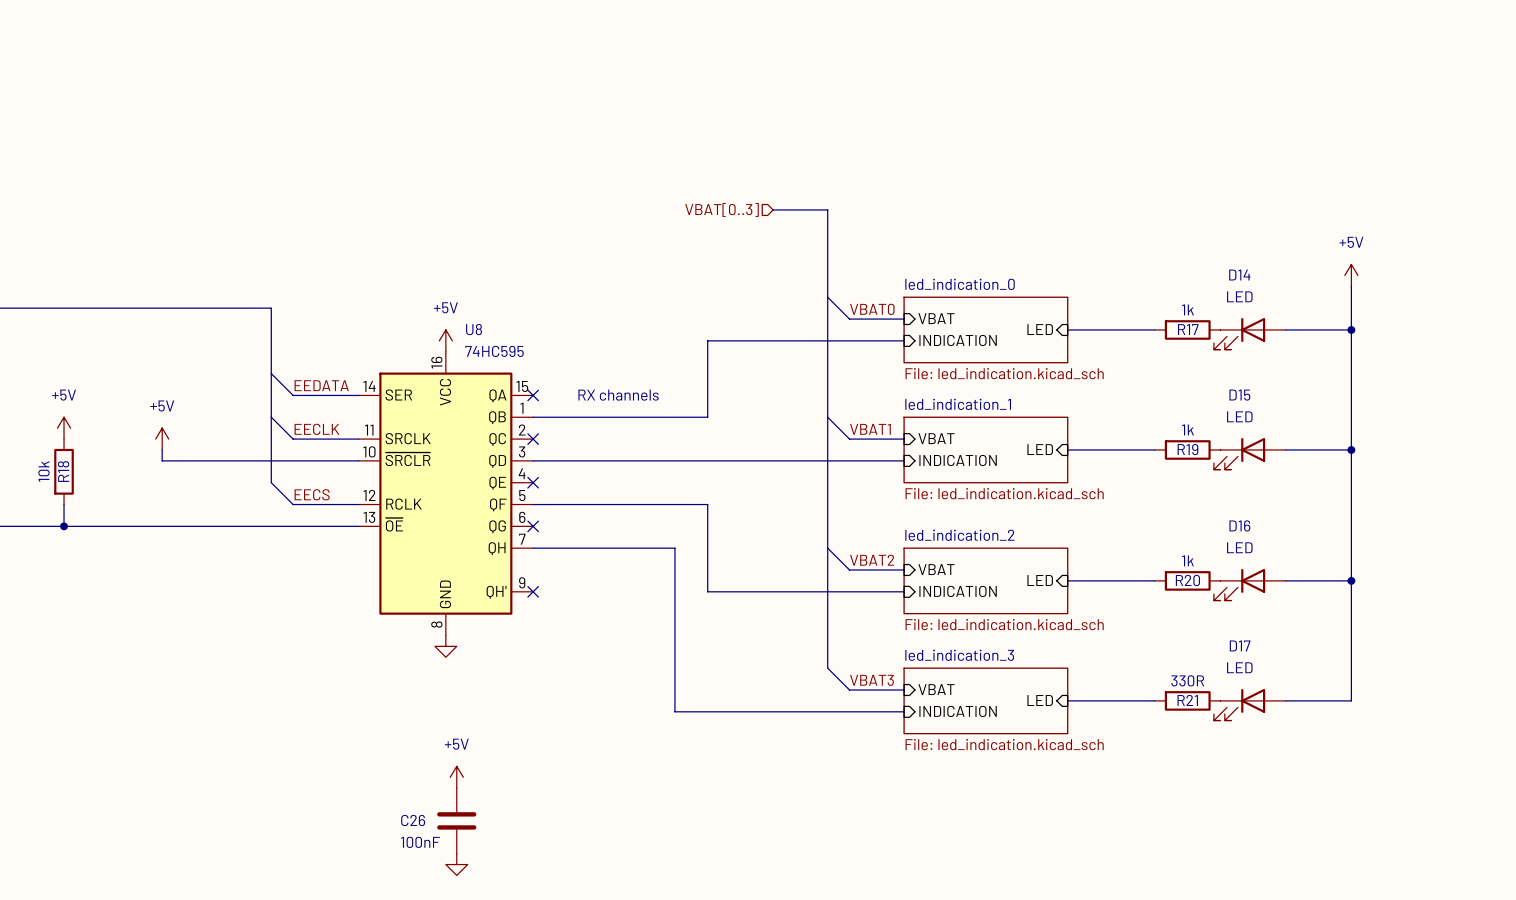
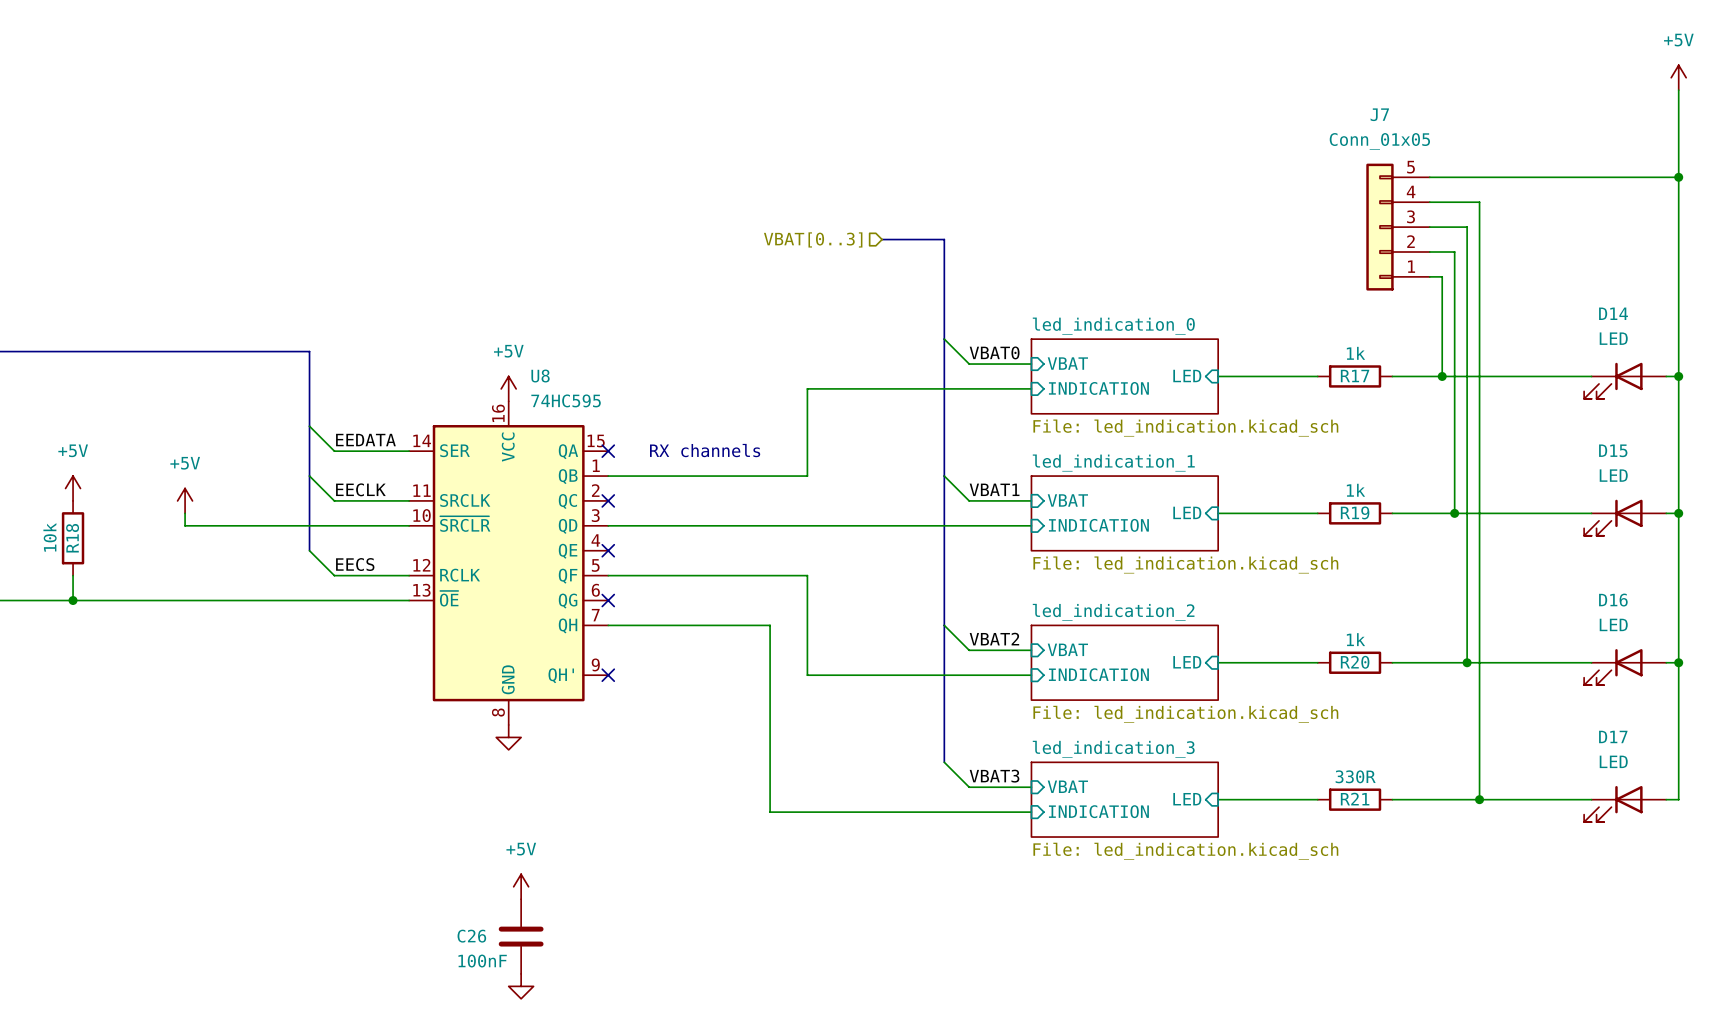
power symbol: none -> +5V (1678, 77)
wire: none -> (1678, 90) (1678, 799) (1666, 799)
wire: none -> (1429, 177) (1678, 177)
junction: none -> (1678, 177)
wire: none -> (1429, 202) (1479, 202) (1479, 799)
J7: none -> Conn_01x05 (1398, 227)
wire: none -> (1429, 227) (1467, 227) (1467, 662) (1392, 662)
wire: none -> (1429, 252) (1454, 252) (1454, 513)
wire: none -> (1429, 276) (1442, 276) (1442, 376)
power symbol: +5V (1351, 275) -> none
wire: (1351, 286) (1351, 700) -> (1591, 799) (1541, 799)
junction: none -> (1442, 376)
wire: none -> (1541, 376) (1591, 376)
junction: (1351, 329) -> none
wire: none -> (1666, 376) (1678, 376)
junction: none -> (1678, 376)
D14 position: (1249, 333) -> (1625, 380)
junction: none -> (1454, 513)
wire: none -> (1541, 513) (1591, 513)
junction: (1351, 449) -> none
wire: none -> (1666, 513) (1678, 513)
junction: none -> (1678, 513)
D15 position: (1249, 453) -> (1625, 517)
junction: none -> (1467, 662)
wire: none -> (1541, 662) (1591, 662)
junction: (1351, 580) -> none
wire: none -> (1666, 662) (1678, 662)
junction: none -> (1678, 662)
D16 position: (1249, 584) -> (1625, 667)
junction: none -> (1479, 799)
D17 position: (1249, 704) -> (1625, 804)

